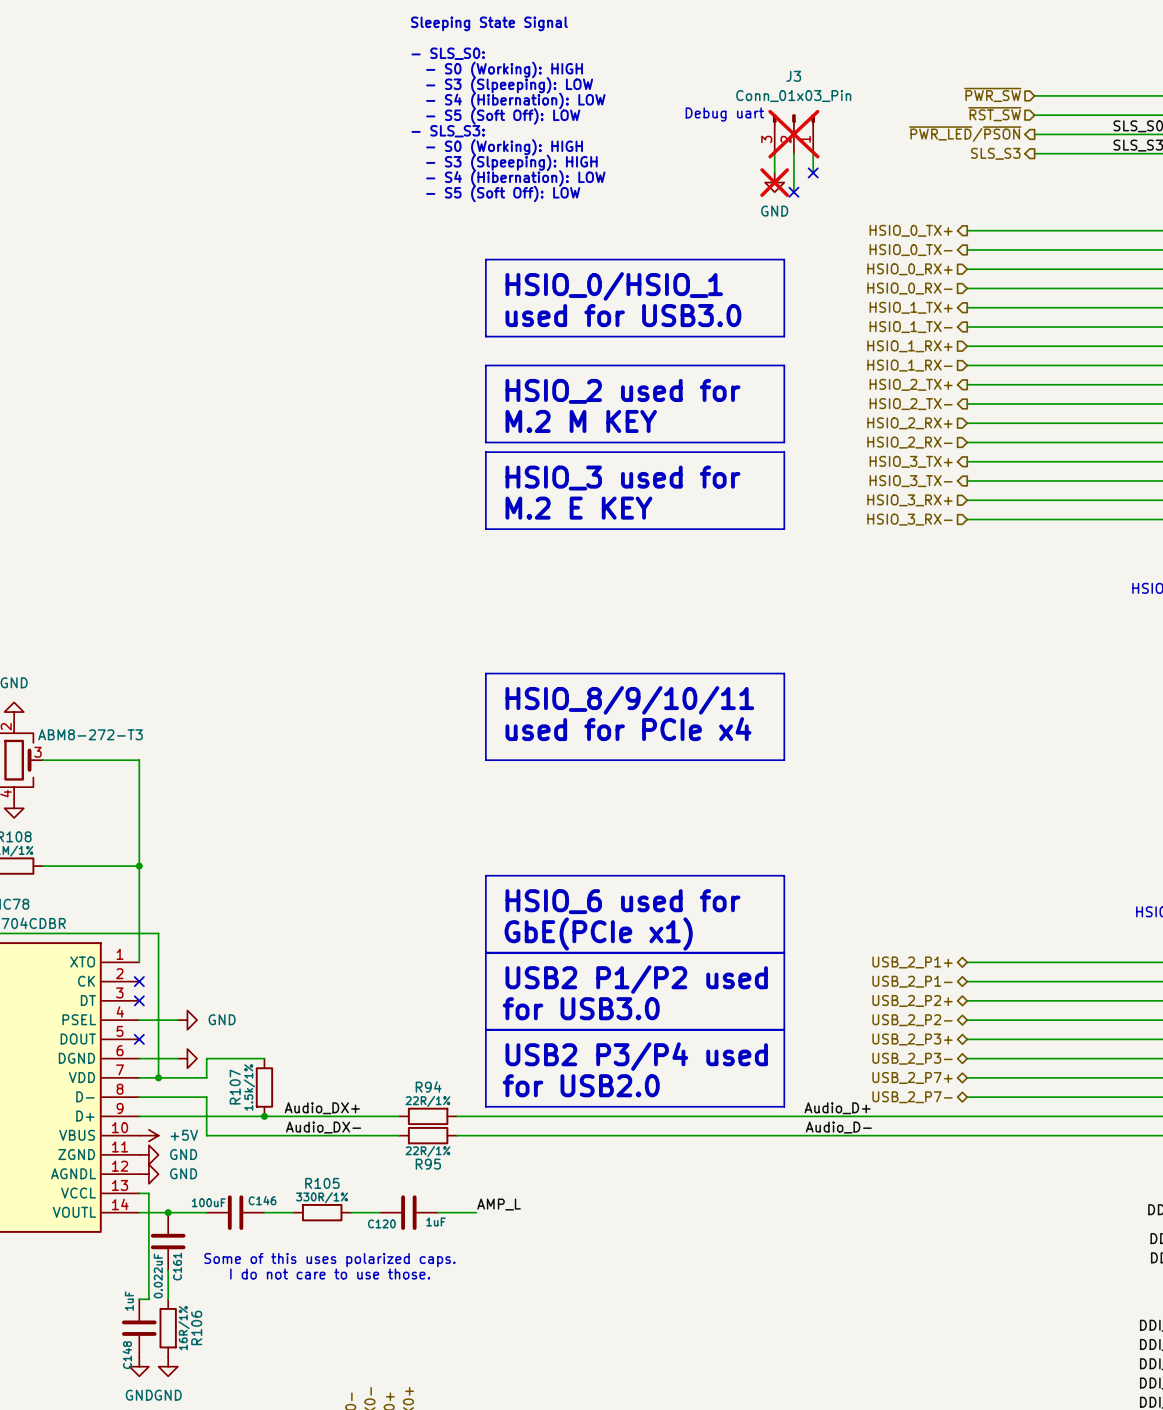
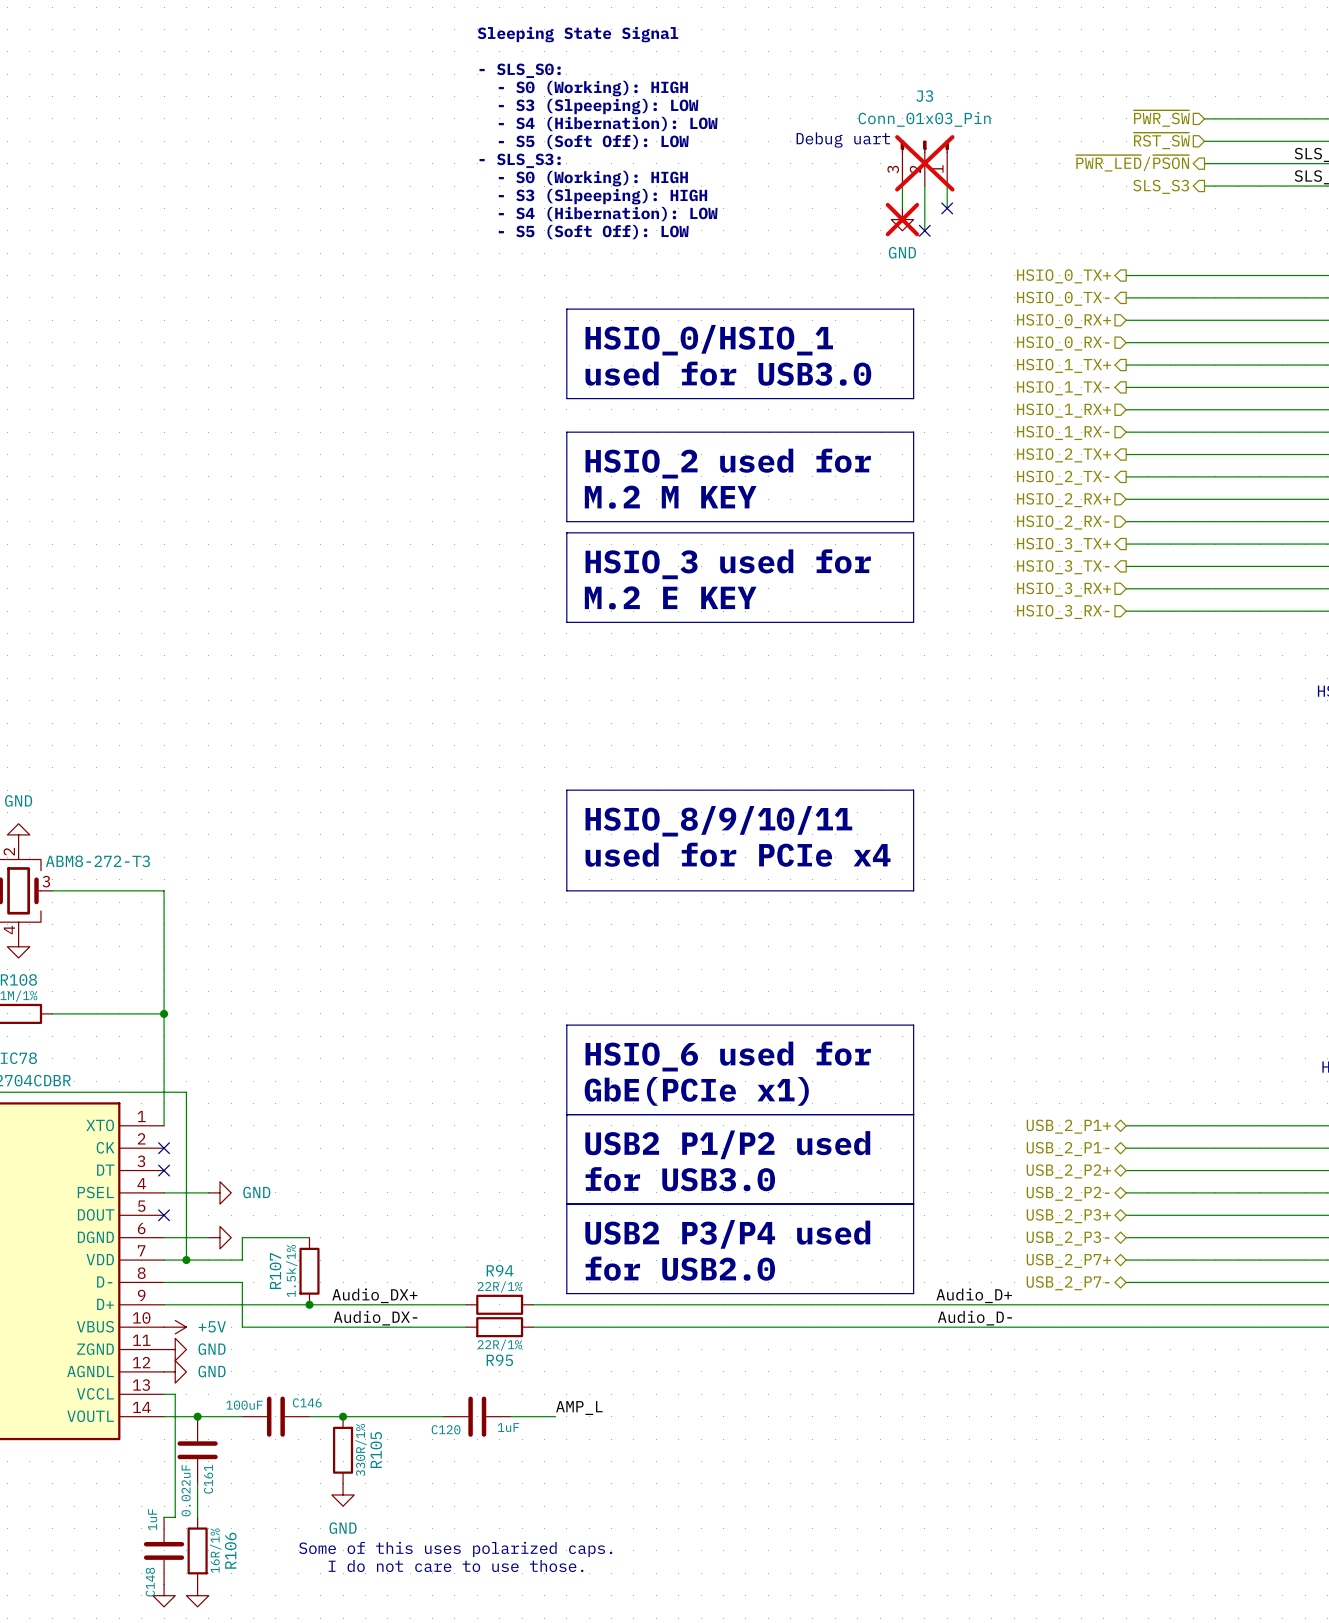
wire: none -> (343, 1416) (410, 1416)
junction: none -> (343, 1416)
R105 rotation: 0° (322, 1212) -> 90° clockwise (343, 1450)
R105 position: (322, 1212) -> (343, 1450)
text position: Some of this uses polarized caps. (329, 1260) -> Some of this uses polarized caps. (455, 1549)
text position: I do not care to use those. (330, 1273) -> I do not care to use those. (456, 1566)
power symbol: none -> GND (343, 1494)

